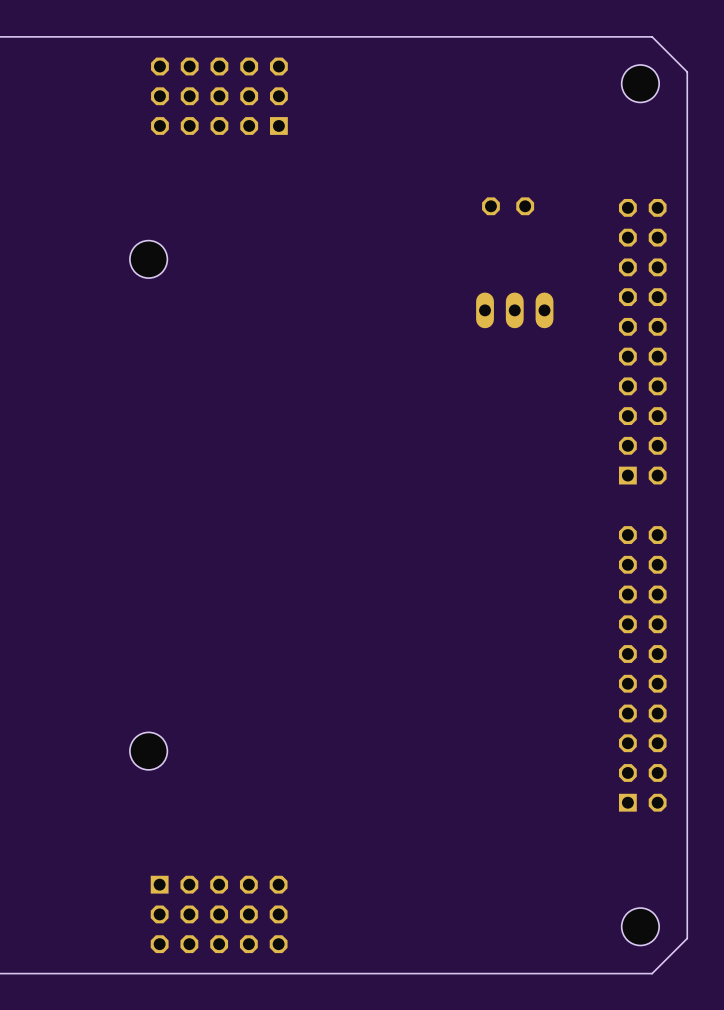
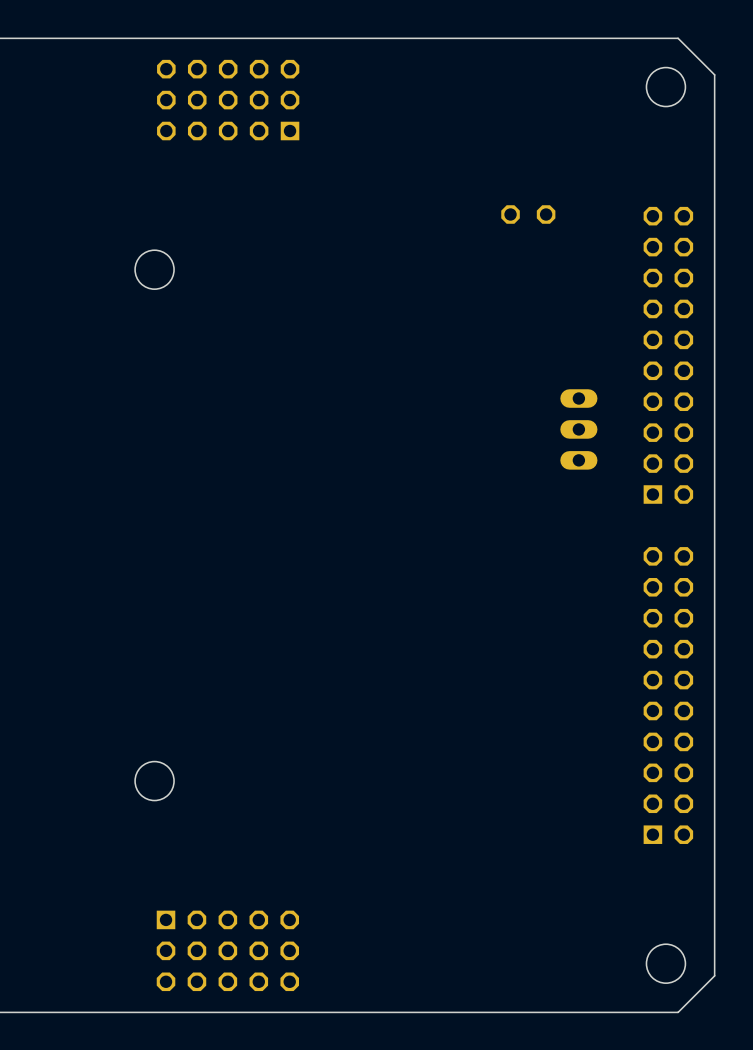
part rotation: 0° (514, 310) -> 90° clockwise (578, 429)
part position: (514, 310) -> (578, 429)

